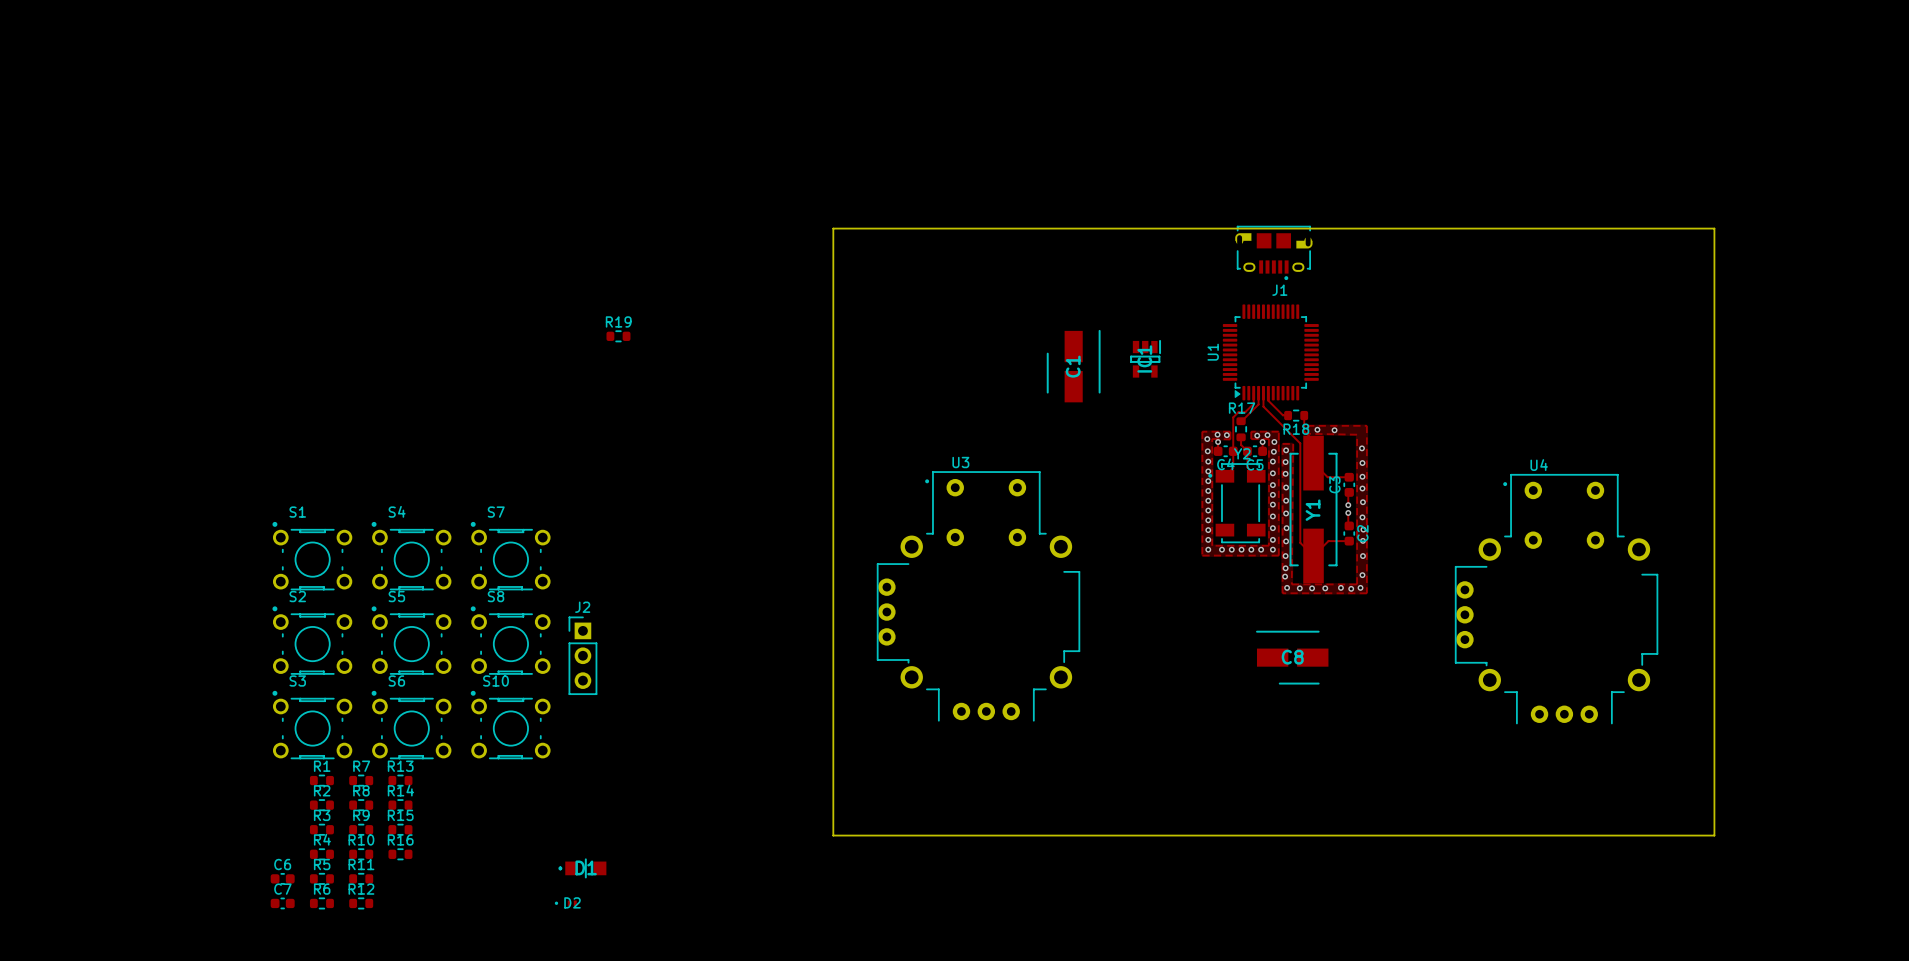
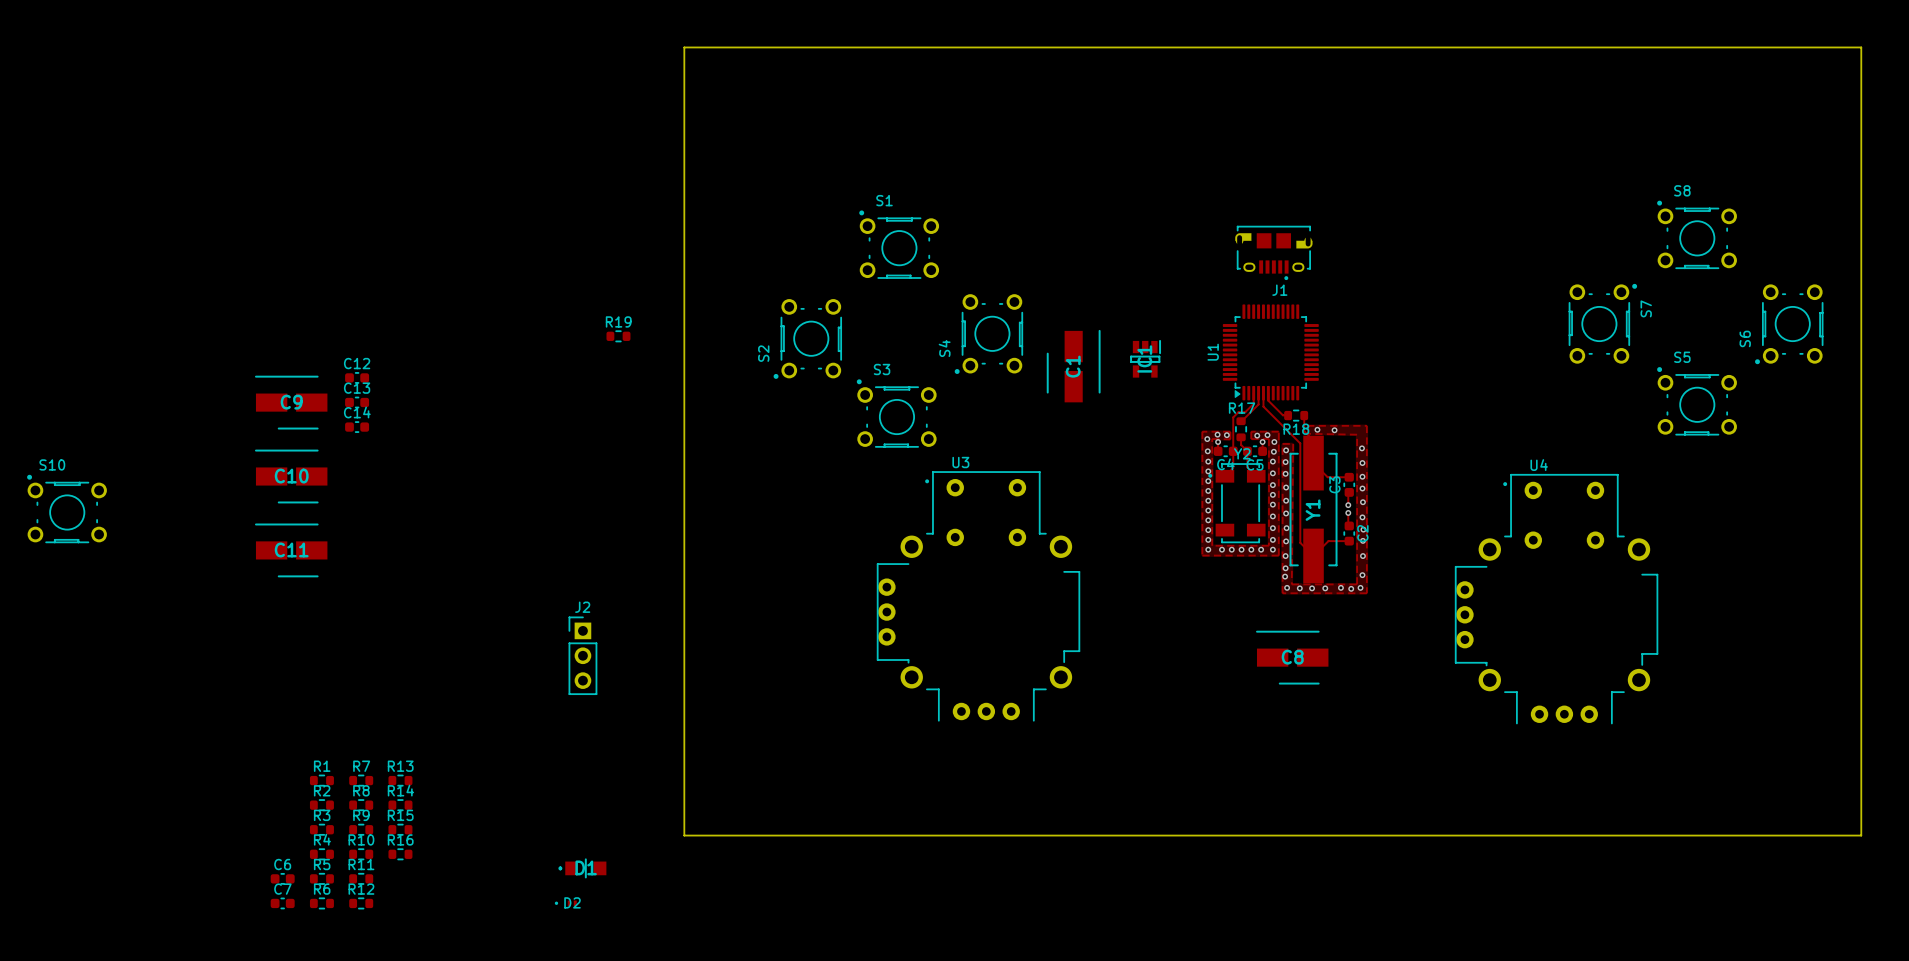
C12: none -> (357, 377)
C9: none -> (291, 402)
C13: none -> (357, 402)
C14: none -> (357, 427)
C10: none -> (291, 476)
C11: none -> (291, 550)
S1 position: (312, 556) -> (899, 244)
S4 rotation: 0° (411, 556) -> 90° counterclockwise (988, 334)
S4 position: (411, 556) -> (988, 334)
S7 rotation: 0° (510, 556) -> 90° clockwise (1602, 323)
S7 position: (510, 556) -> (1602, 323)
S2 rotation: 0° (312, 640) -> 90° counterclockwise (807, 338)
S2 position: (312, 640) -> (807, 338)
S5 position: (411, 640) -> (1697, 401)
S8 position: (510, 640) -> (1697, 234)
S3 position: (312, 724) -> (896, 413)
S6 rotation: 0° (411, 724) -> 90° counterclockwise (1789, 324)
S6 position: (411, 724) -> (1789, 324)
S10 position: (510, 724) -> (67, 508)
board edge: (833, 835) (833, 228) (1714, 228) (1714, 835) -> (833, 835) (684, 835) (684, 47) (1861, 47) (1861, 835) (1714, 835)

